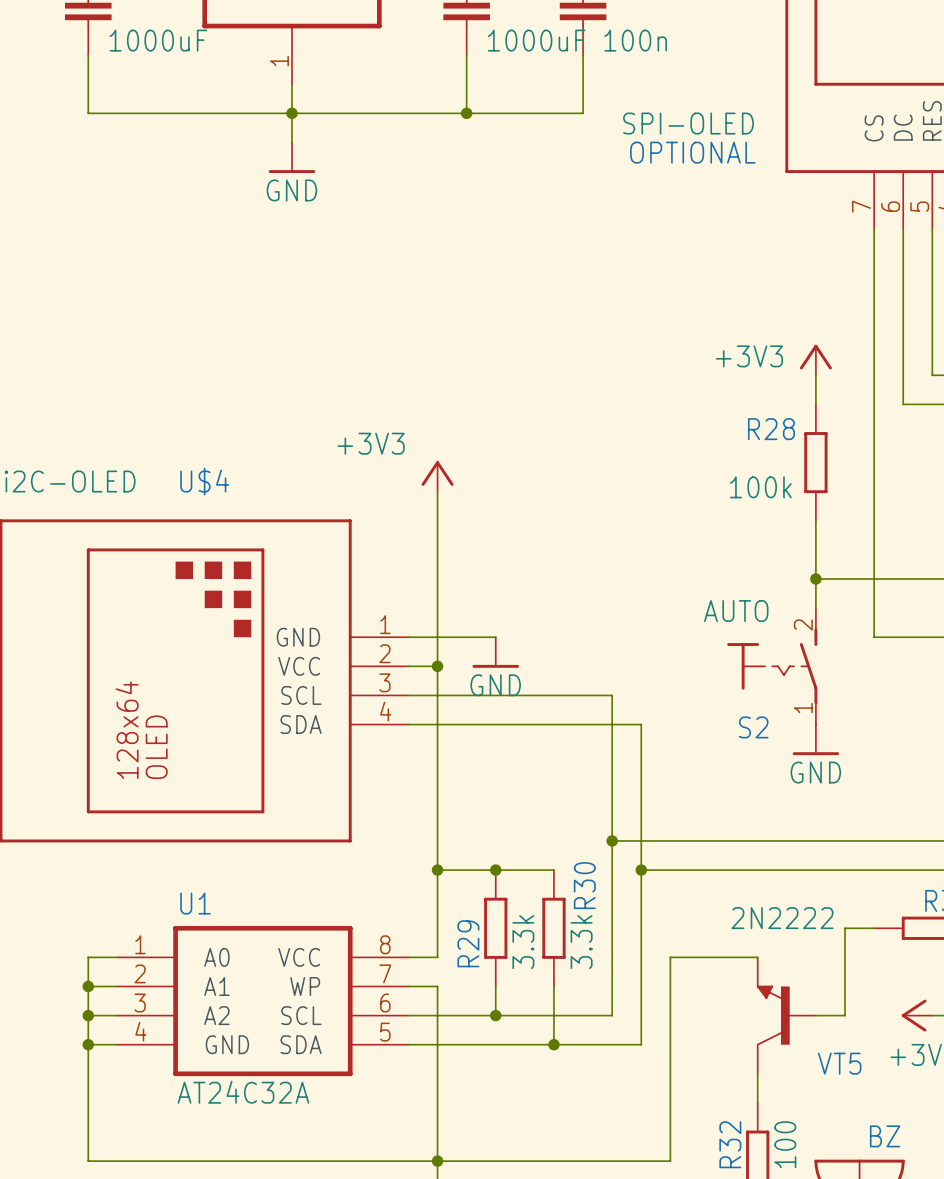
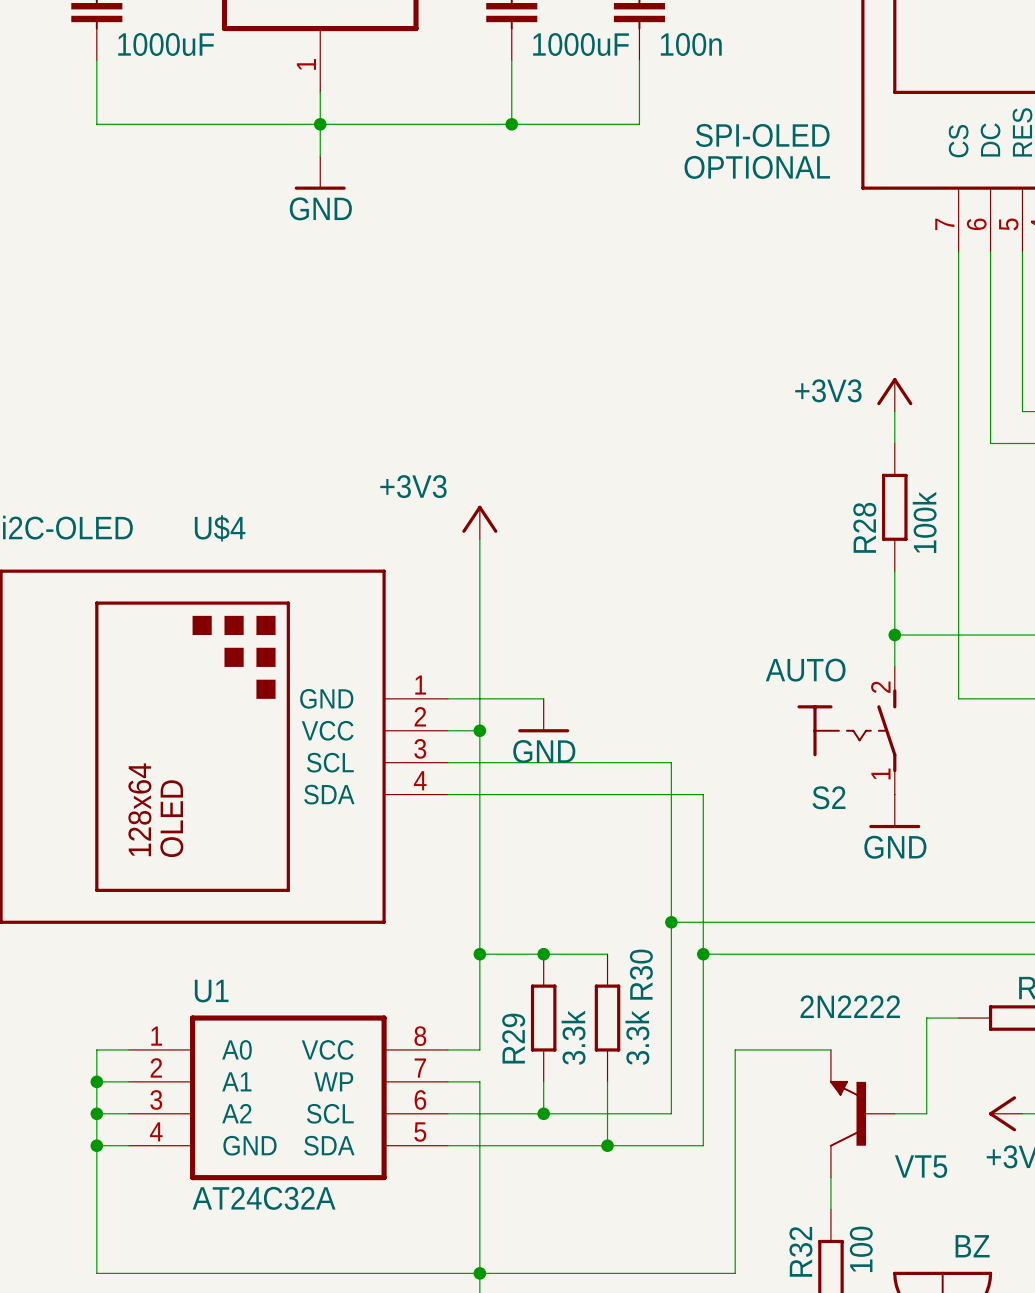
R28 name rotation: 0° (771, 429) -> 90° counterclockwise (864, 527)
R28 value rotation: 0° (760, 487) -> 90° counterclockwise (924, 522)
R28 value position: 100k (760, 487) -> 100k (924, 522)

